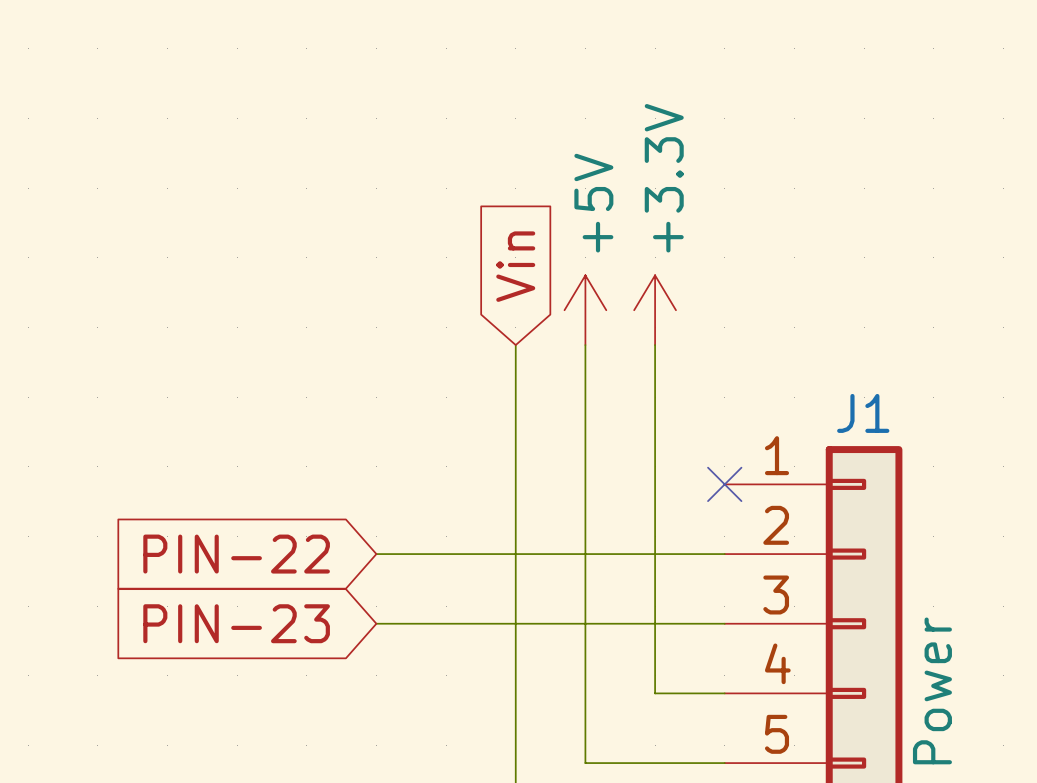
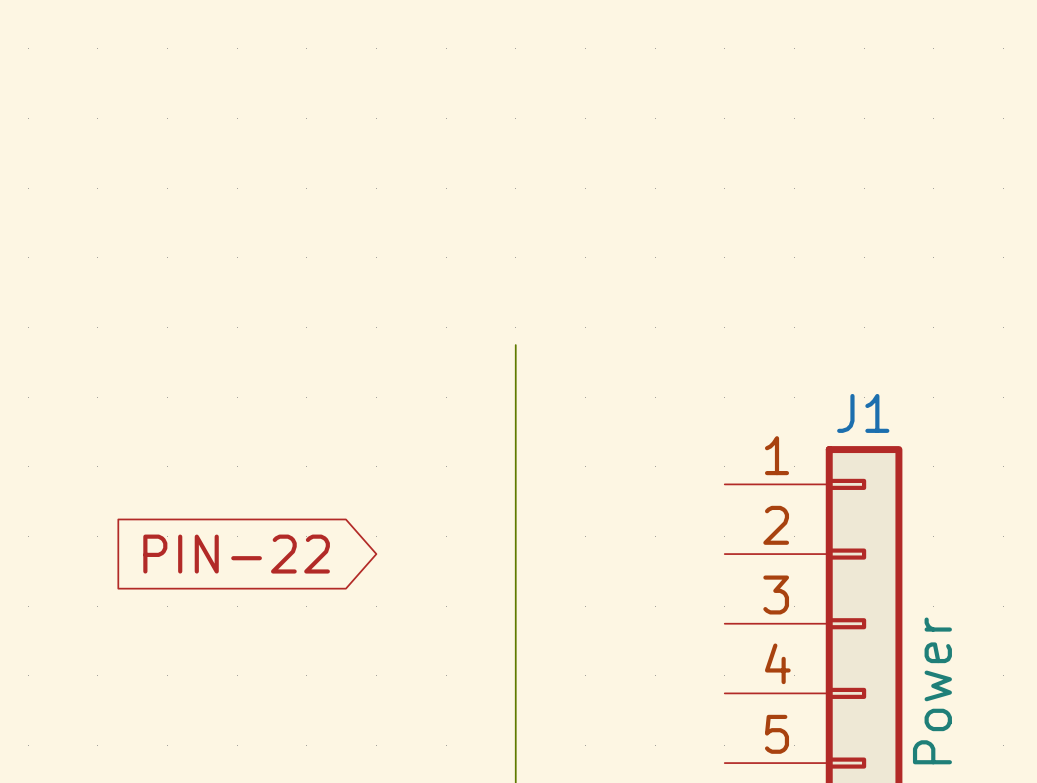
global label: Vin (515, 266) -> none
power symbol: +5V (585, 310) -> none
power symbol: +3.3V (655, 310) -> none
wire: (585, 345) (585, 763) (724, 763) -> none
wire: (655, 345) (655, 693) (724, 693) -> none
no-connect mark: (724, 484) -> none
wire: (376, 554) (724, 554) -> none
global label: PIN-23 (236, 623) -> none
wire: (376, 623) (724, 623) -> none

